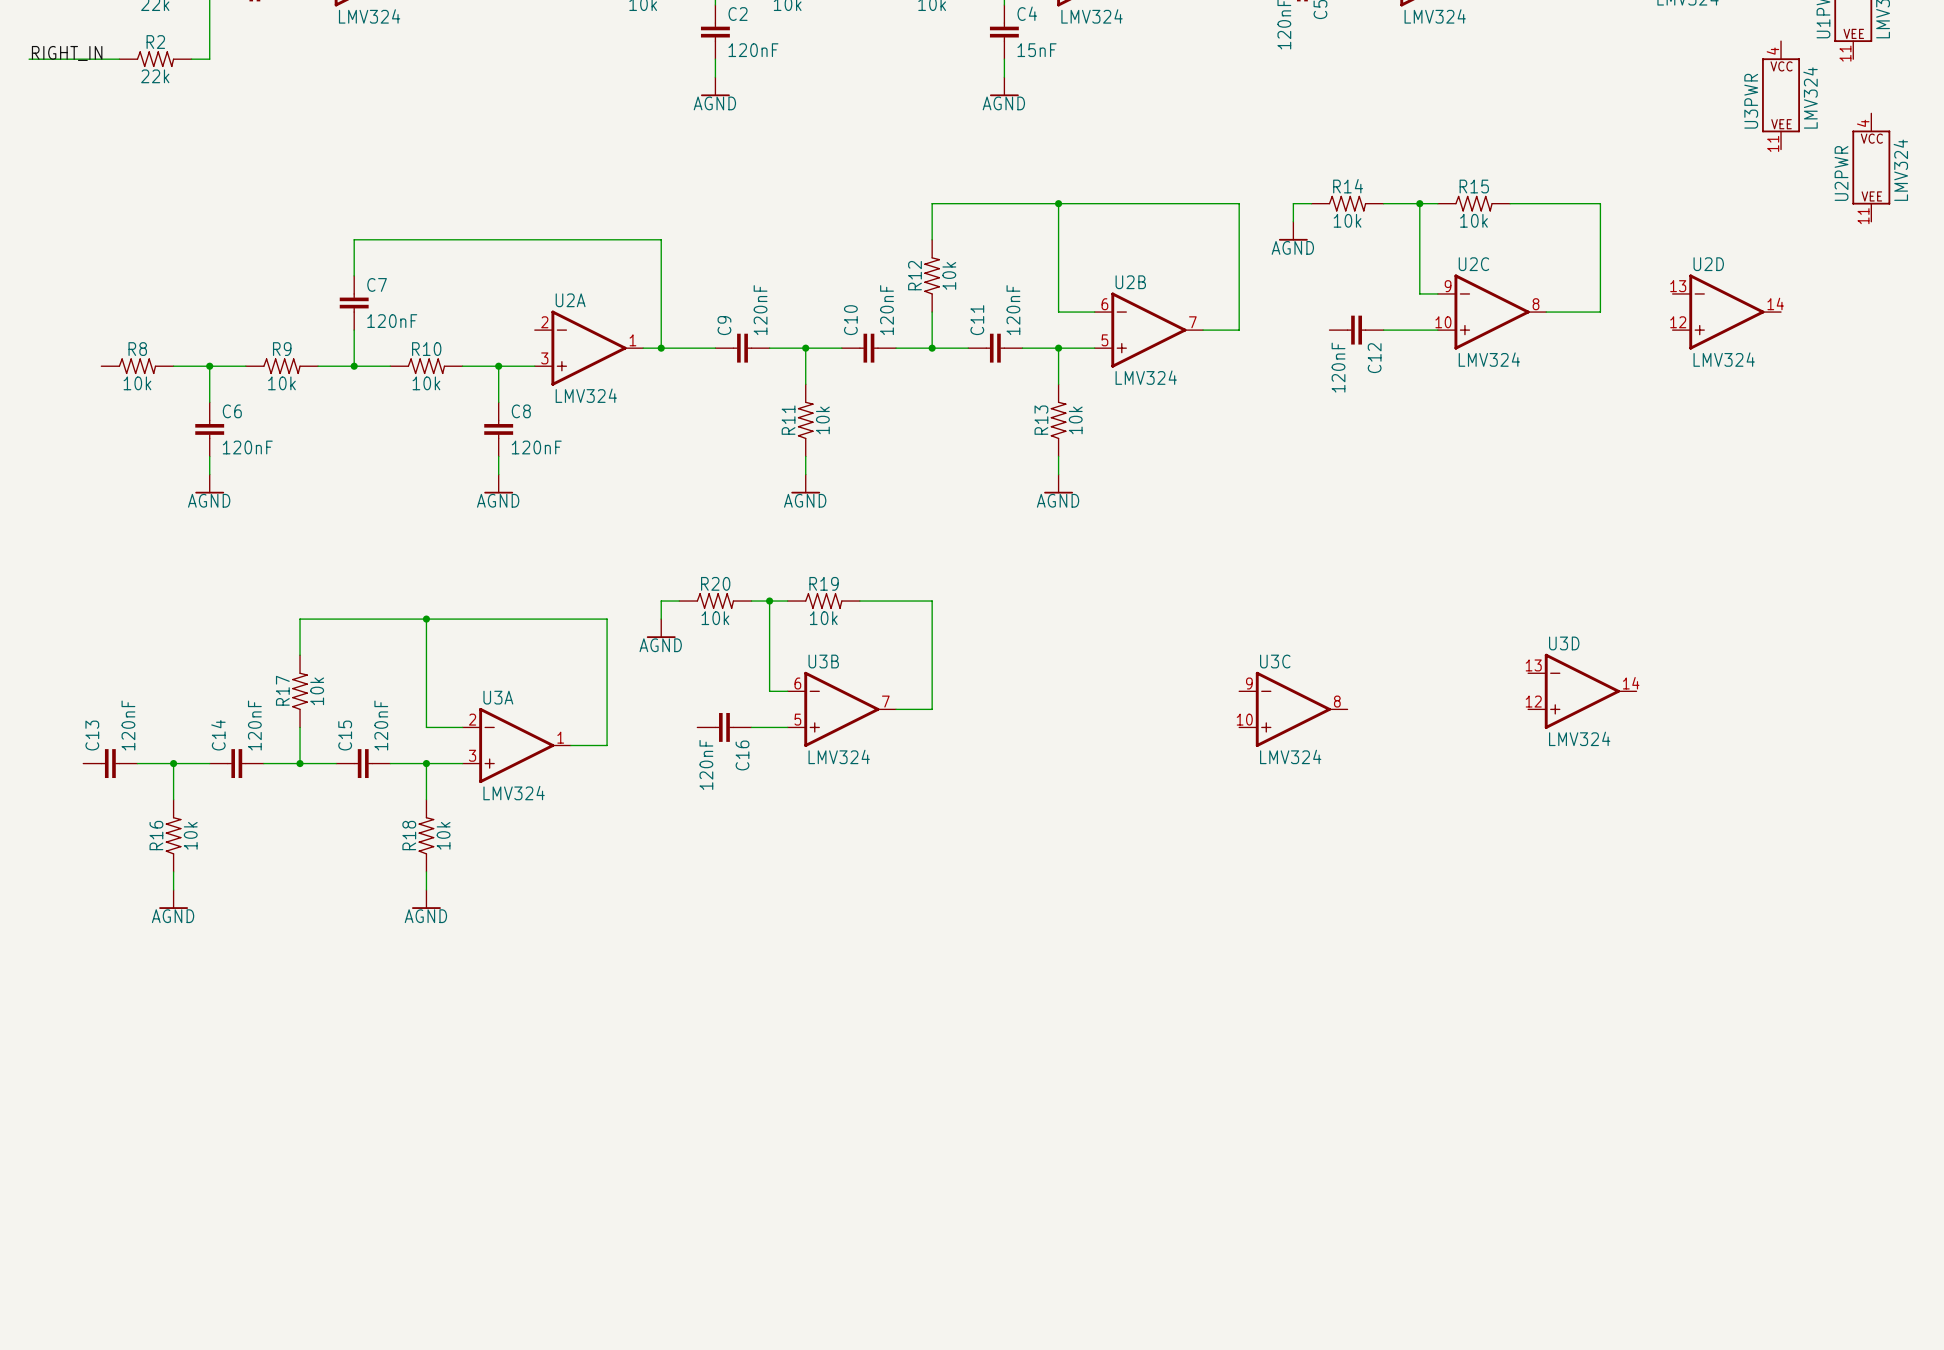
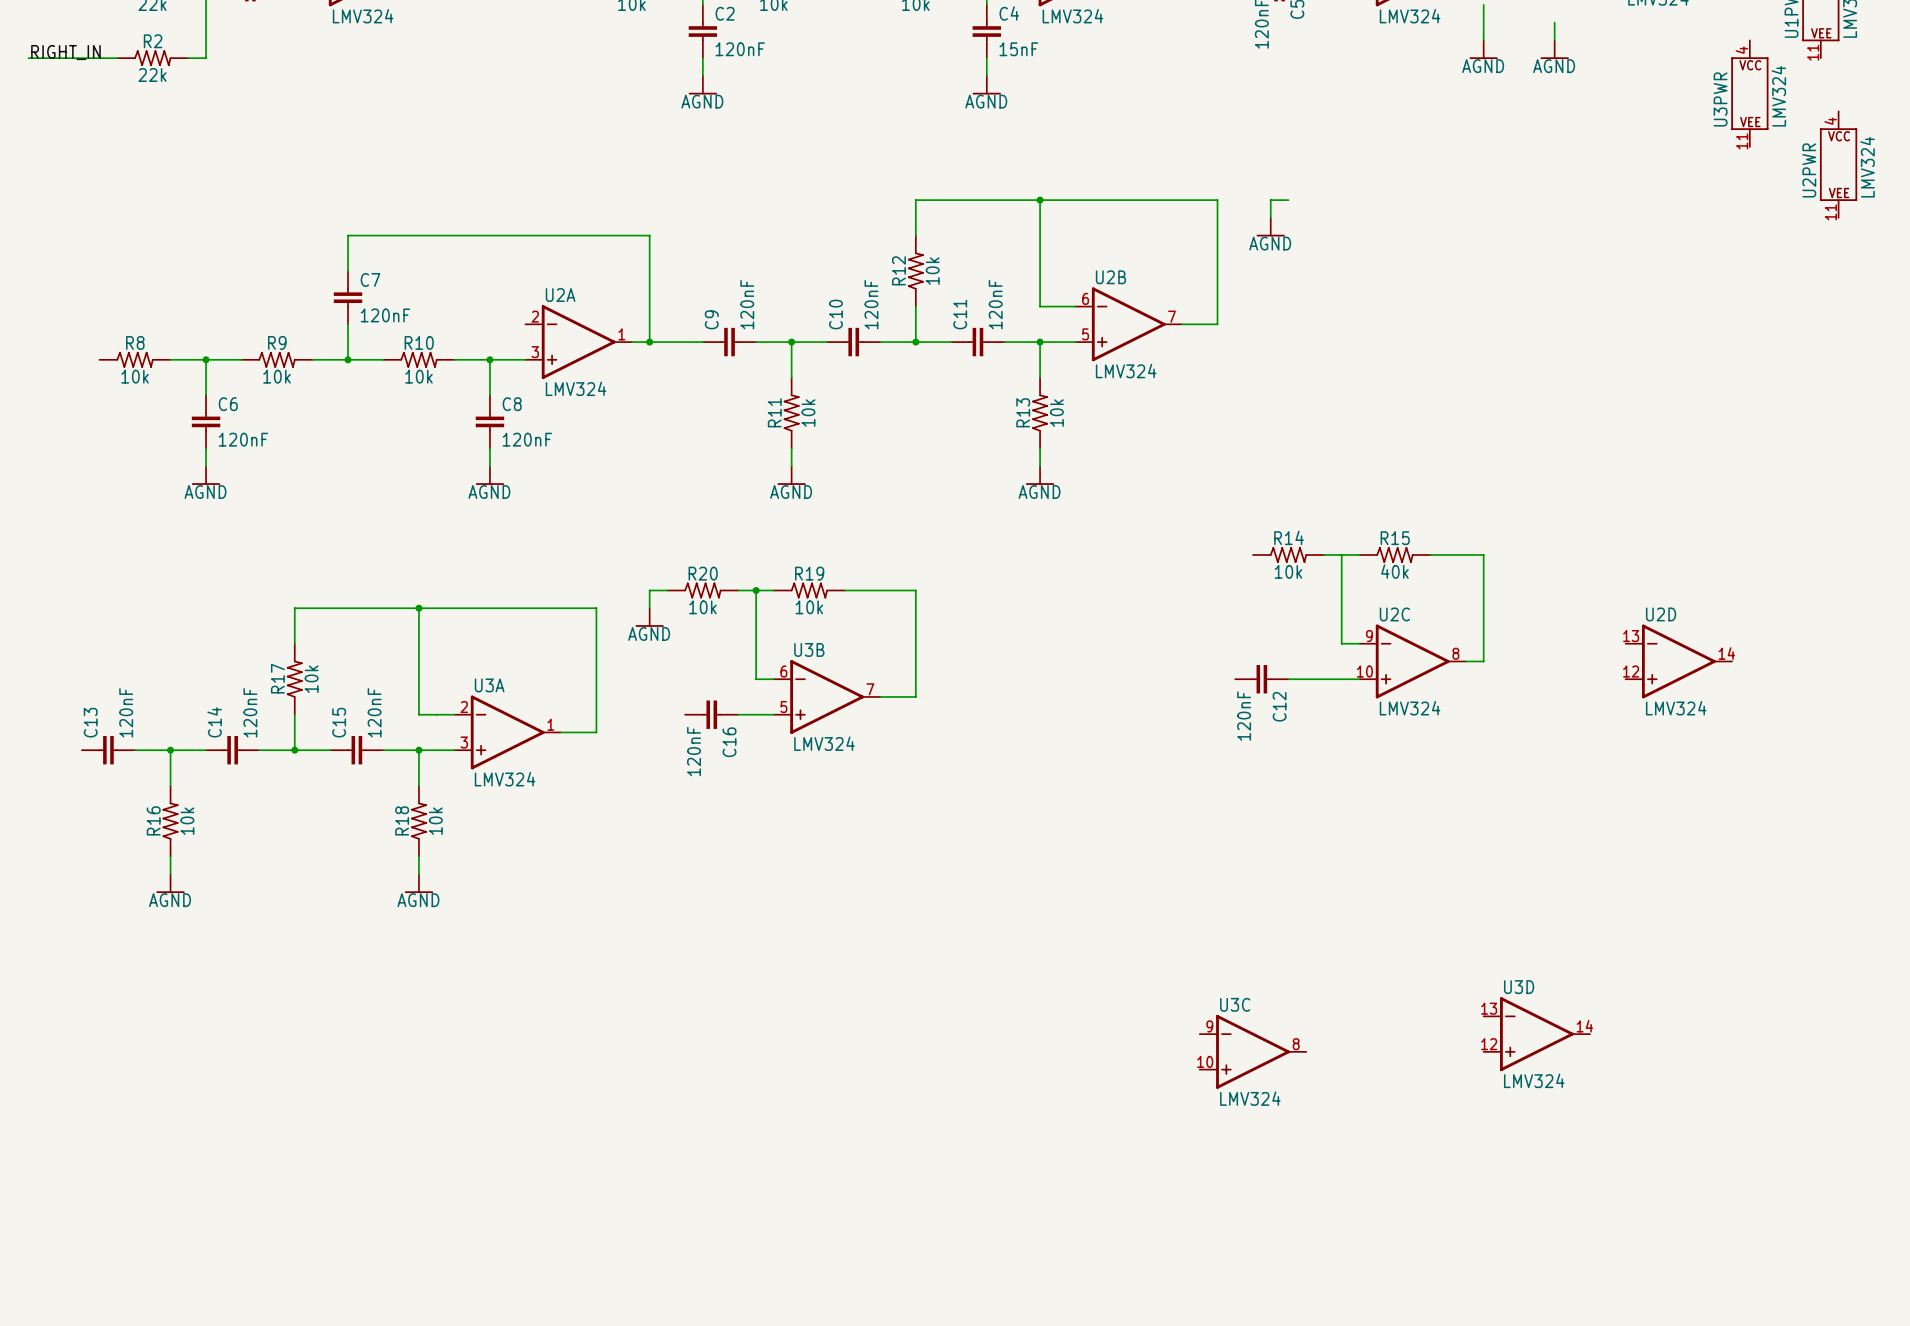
wire: none -> (1483, 4) (1483, 40)
wire: none -> (1554, 22) (1554, 40)
power symbol: none -> AGND (1483, 49)
power symbol: none -> AGND (1554, 49)
R14 position: (1347, 203) -> (1288, 555)
wire: (1383, 203) (1437, 203) -> none
wire: (1419, 203) (1419, 293) (1437, 293) -> none
junction: (1419, 203) -> none
R15 position: (1473, 203) -> (1394, 555)
wire: (1510, 203) (1600, 203) (1600, 312) (1546, 312) -> none
R15 value: 10k (1473, 220) -> 40k (1394, 571)
U2C position: (1492, 312) -> (1412, 661)
U2D position: (1726, 312) -> (1678, 661)
C12 position: (1356, 330) -> (1261, 679)
wire: (1383, 330) (1437, 330) -> none
wire: none -> (1323, 555) (1359, 555)
wire: none -> (1341, 555) (1341, 643) (1359, 643)
wire: none -> (1430, 555) (1483, 555) (1483, 661) (1465, 661)
wire: none -> (1288, 679) (1359, 679)
U3D position: (1582, 691) -> (1536, 1034)
U3C position: (1293, 709) -> (1252, 1051)

